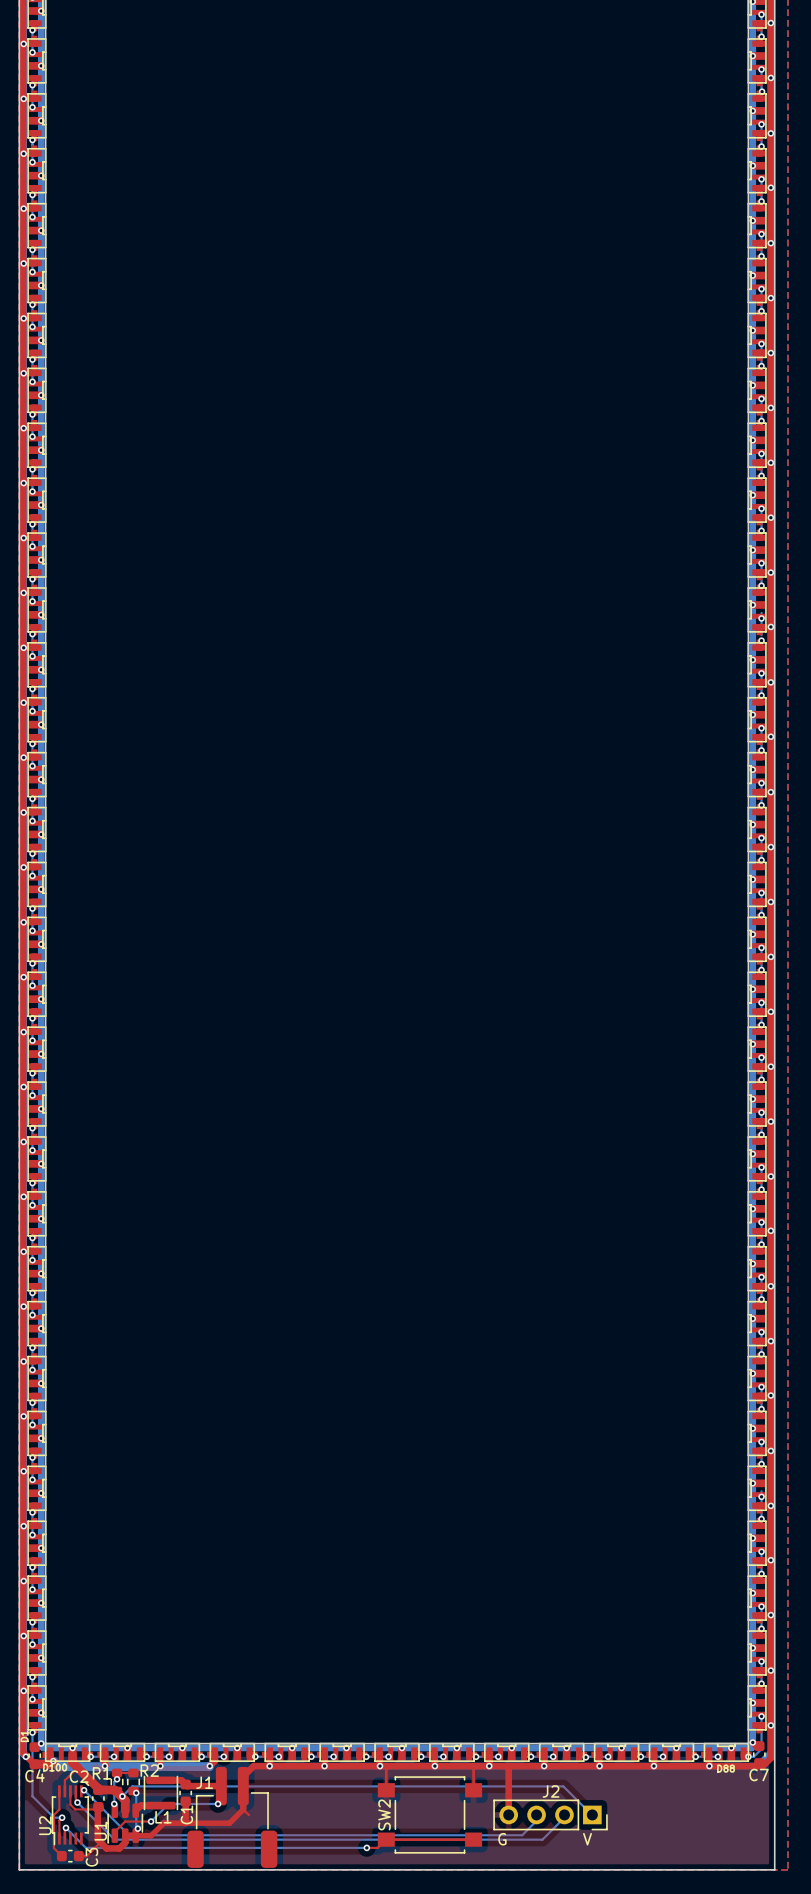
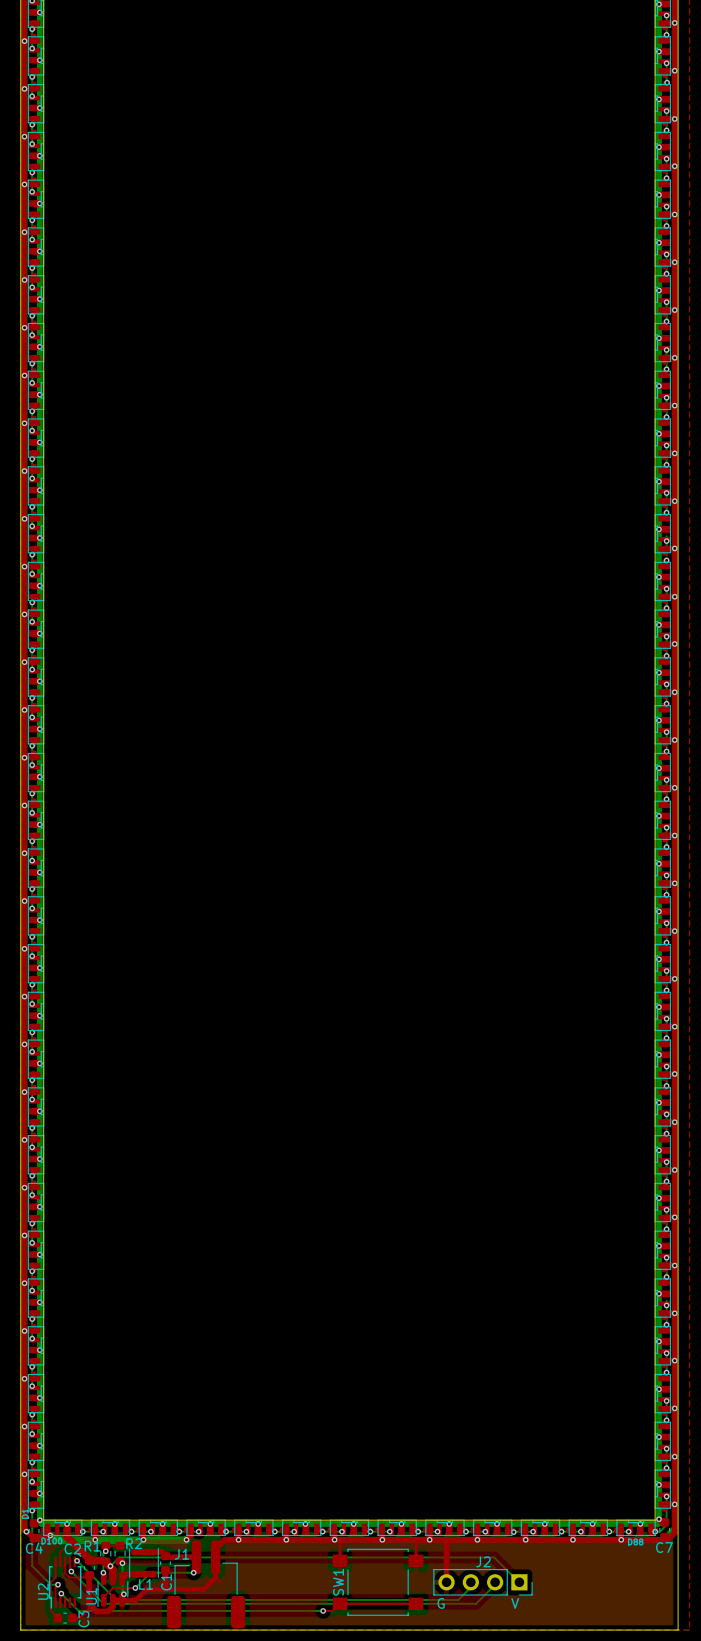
SW2 name: SW2 (384, 1814) -> SW1 (338, 1582)

